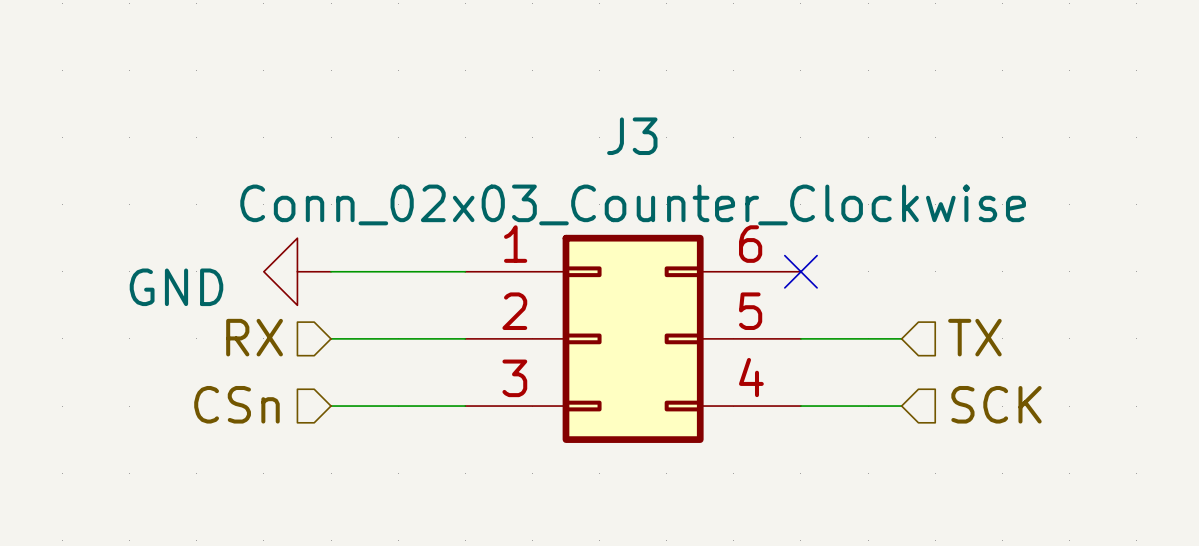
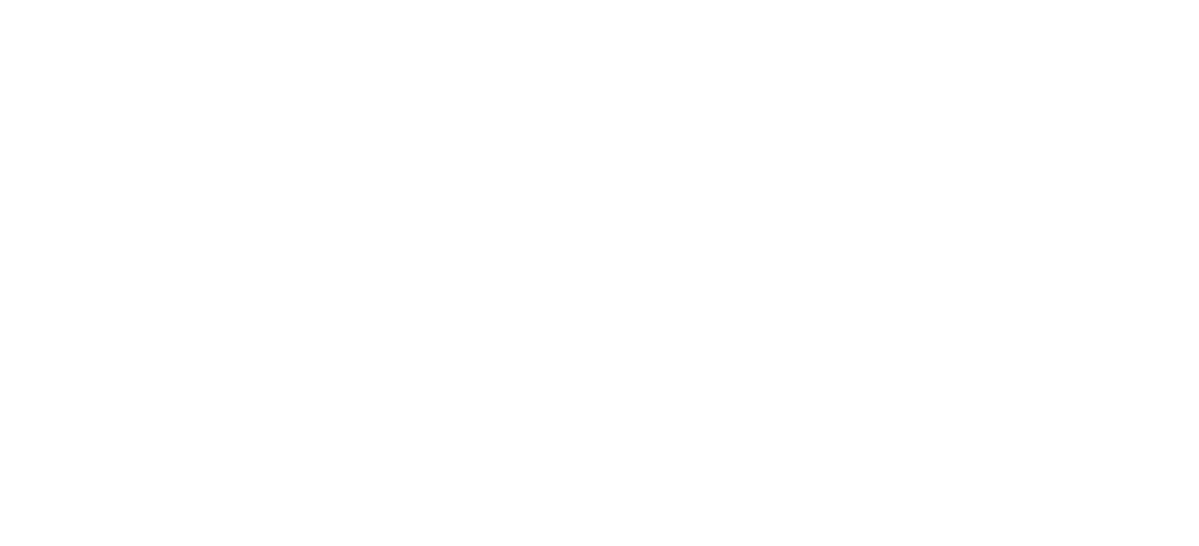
power symbol: GND (297, 271) -> none
wire: (331, 271) (465, 271) -> none
no-connect mark: (800, 271) -> none
hierarchical label: RX (254, 337) -> none
hierarchical label: TX (974, 337) -> none
wire: (331, 338) (465, 338) -> none
J3: Conn_02x03_Counter_Clockwise (633, 338) -> none
wire: (800, 338) (901, 338) -> none
hierarchical label: CSn (236, 404) -> none
hierarchical label: SCK (996, 404) -> none
wire: (331, 406) (465, 406) -> none
wire: (800, 406) (901, 406) -> none

